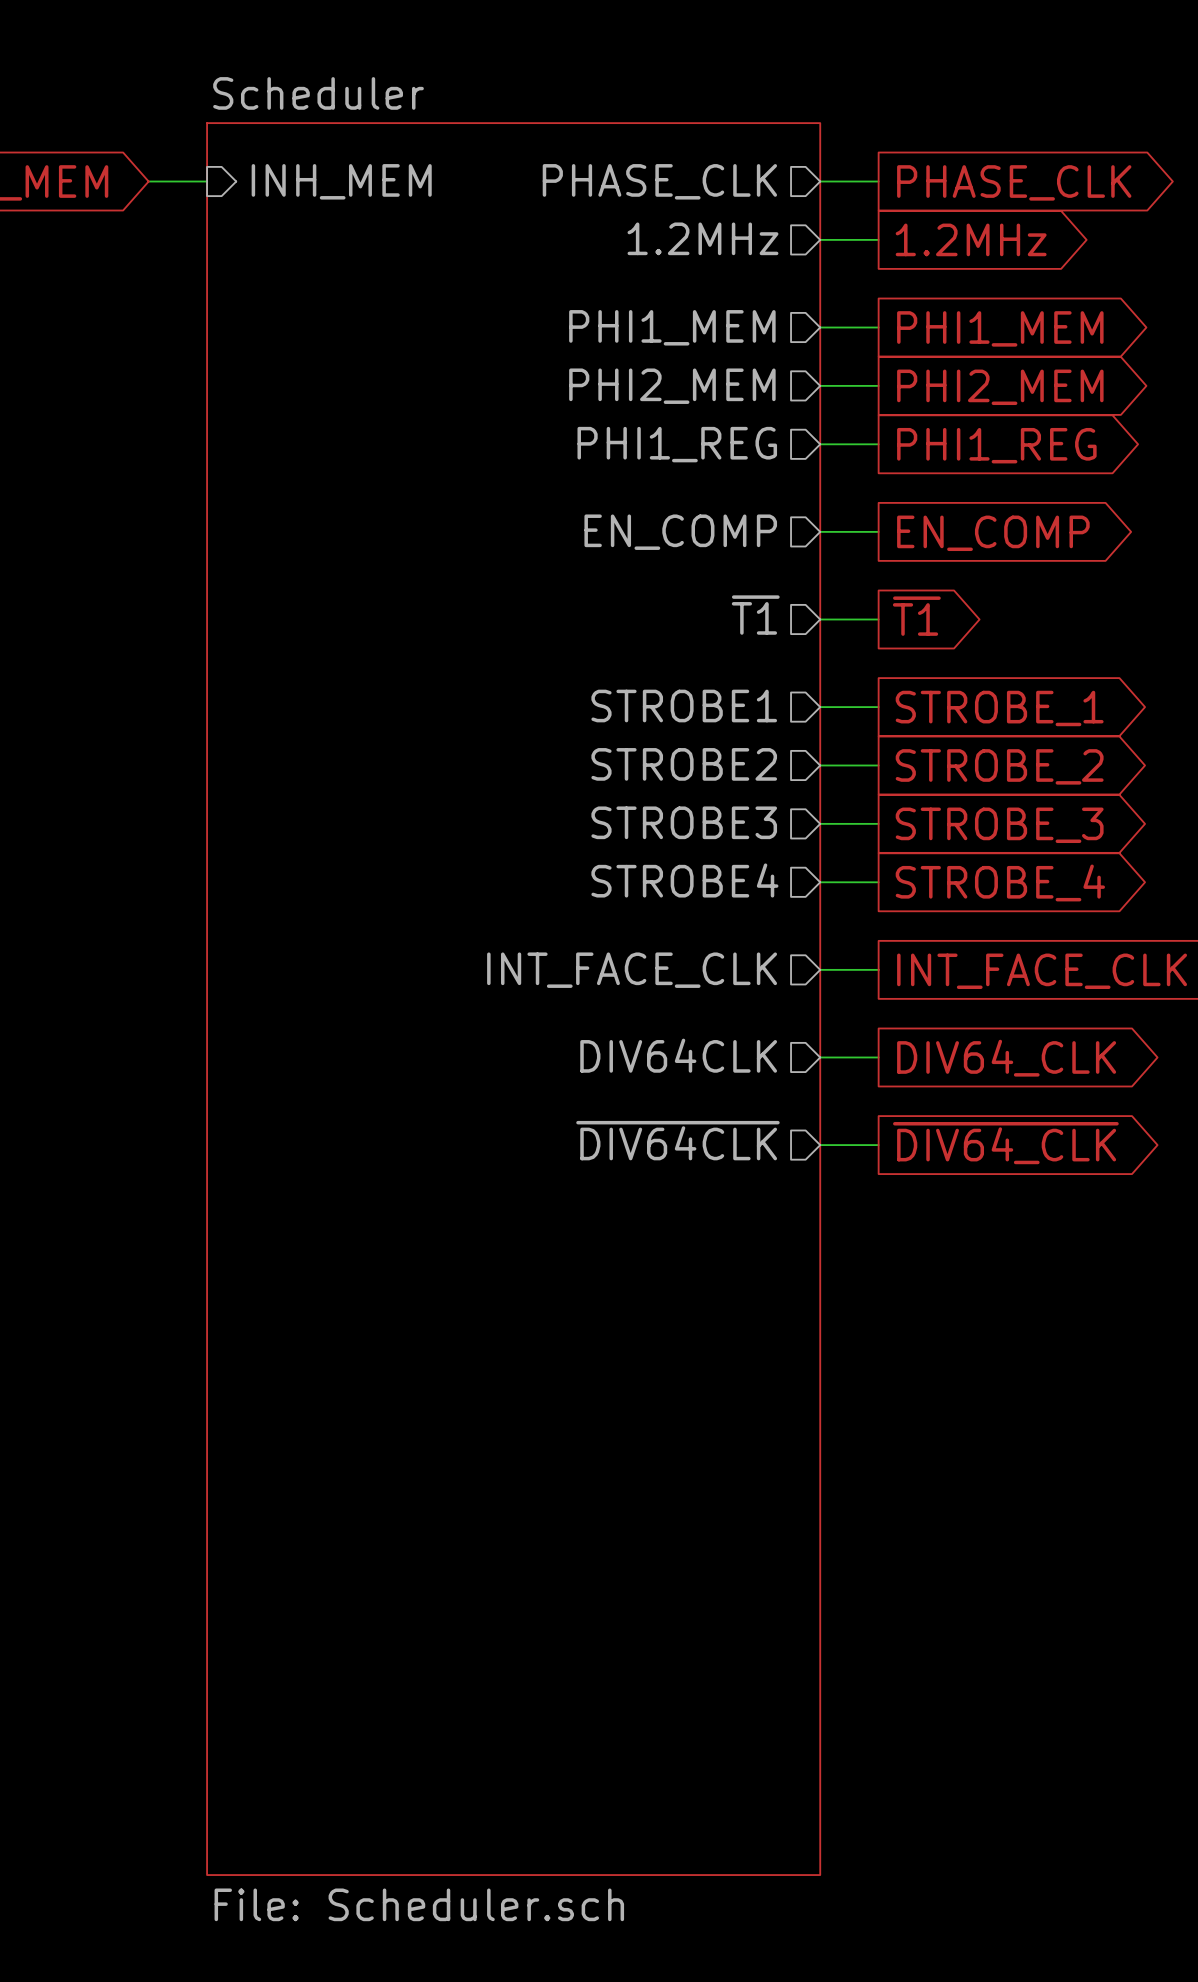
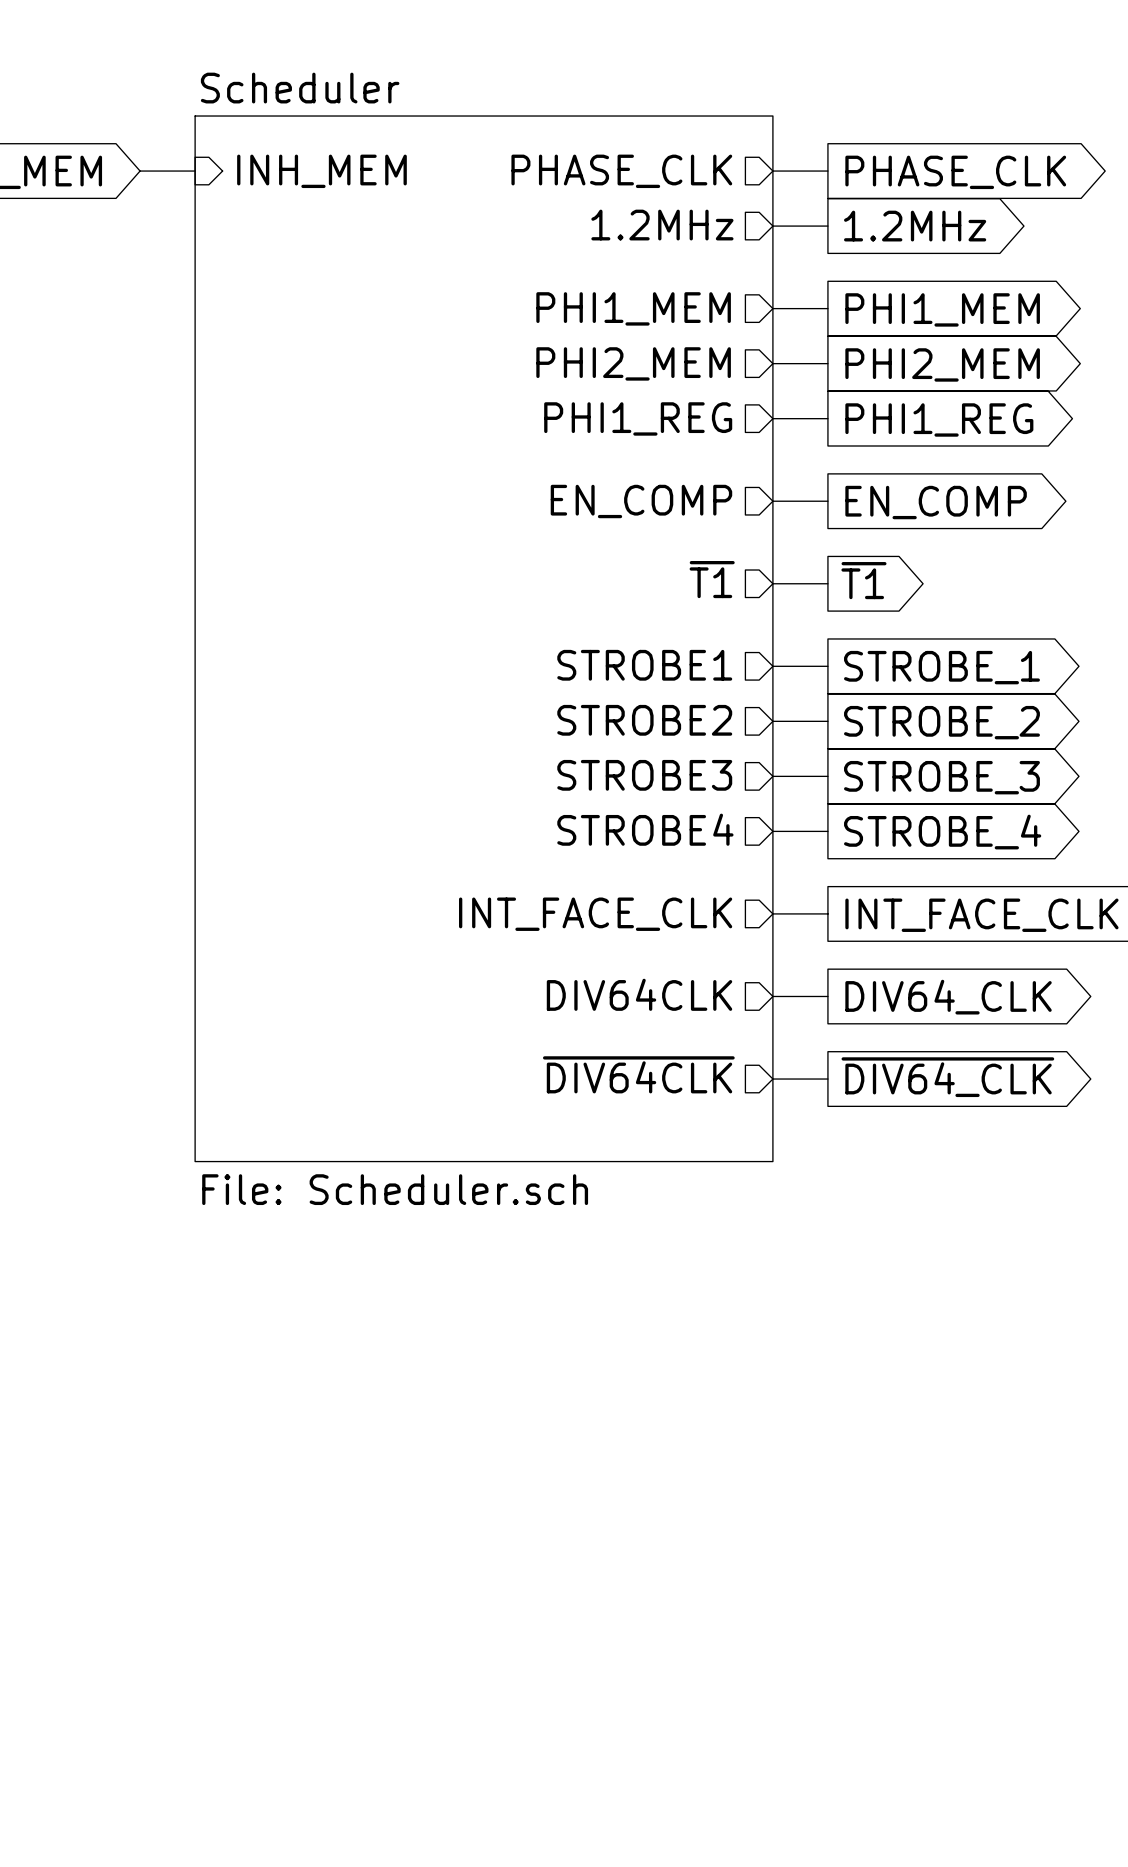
sheet Scheduler: none -> File: Scheduler.sch (484, 638)
sheet Scheduler: File: Scheduler.sch (513, 999) -> none

